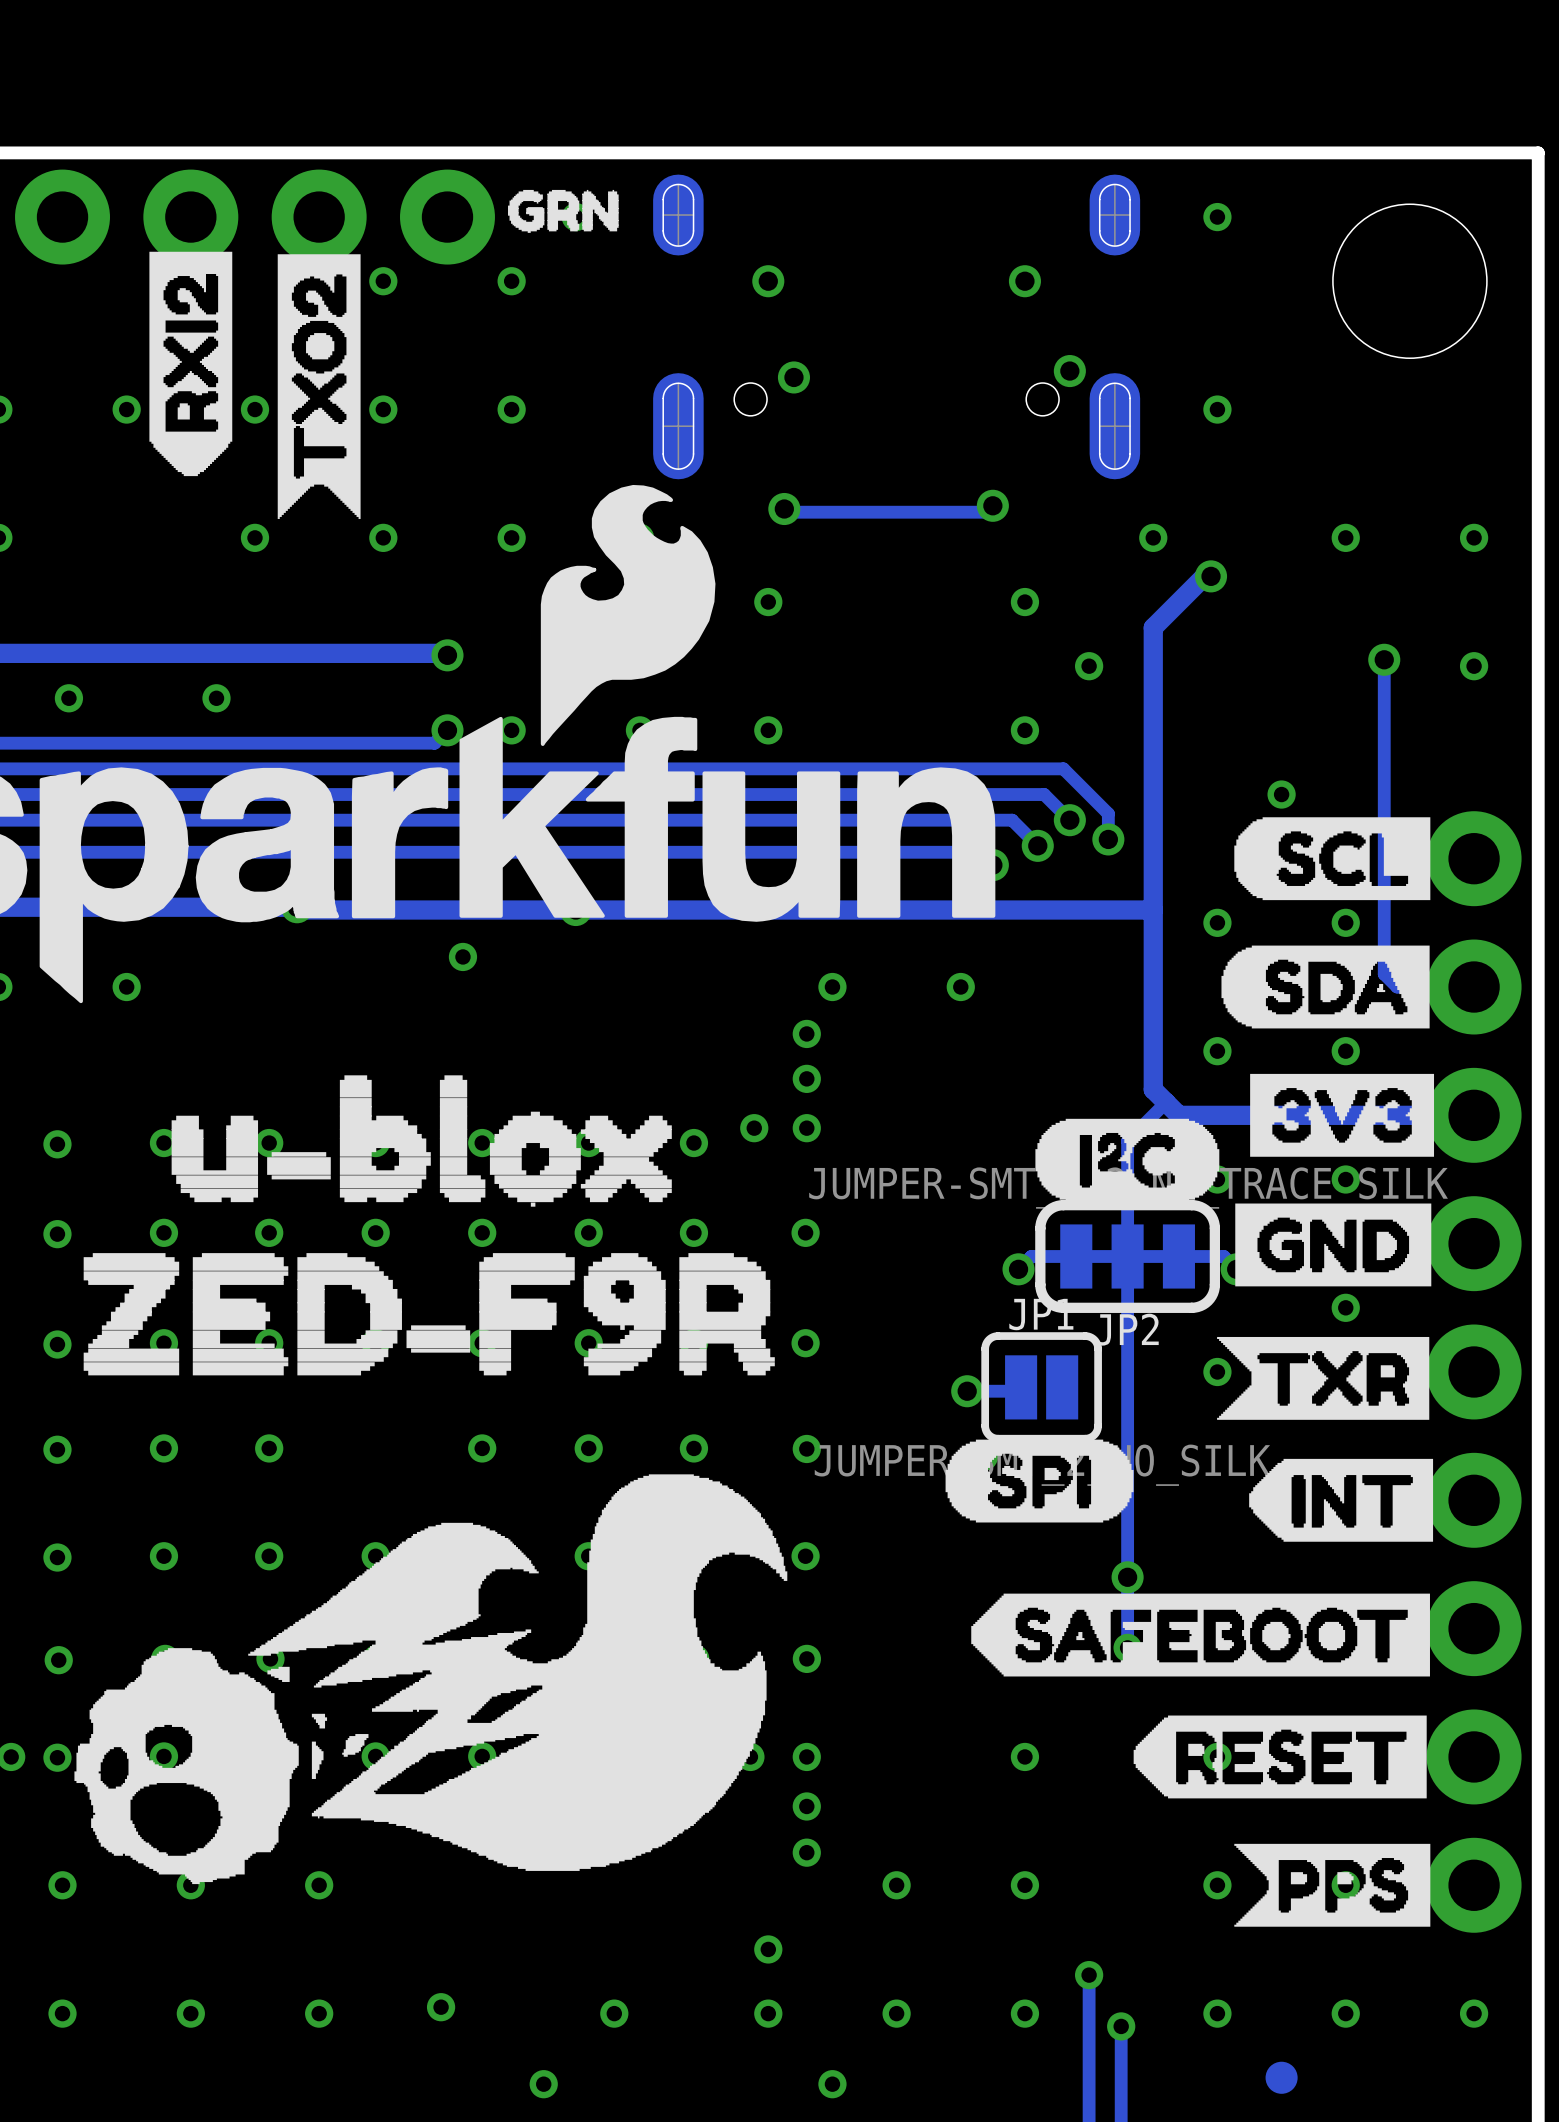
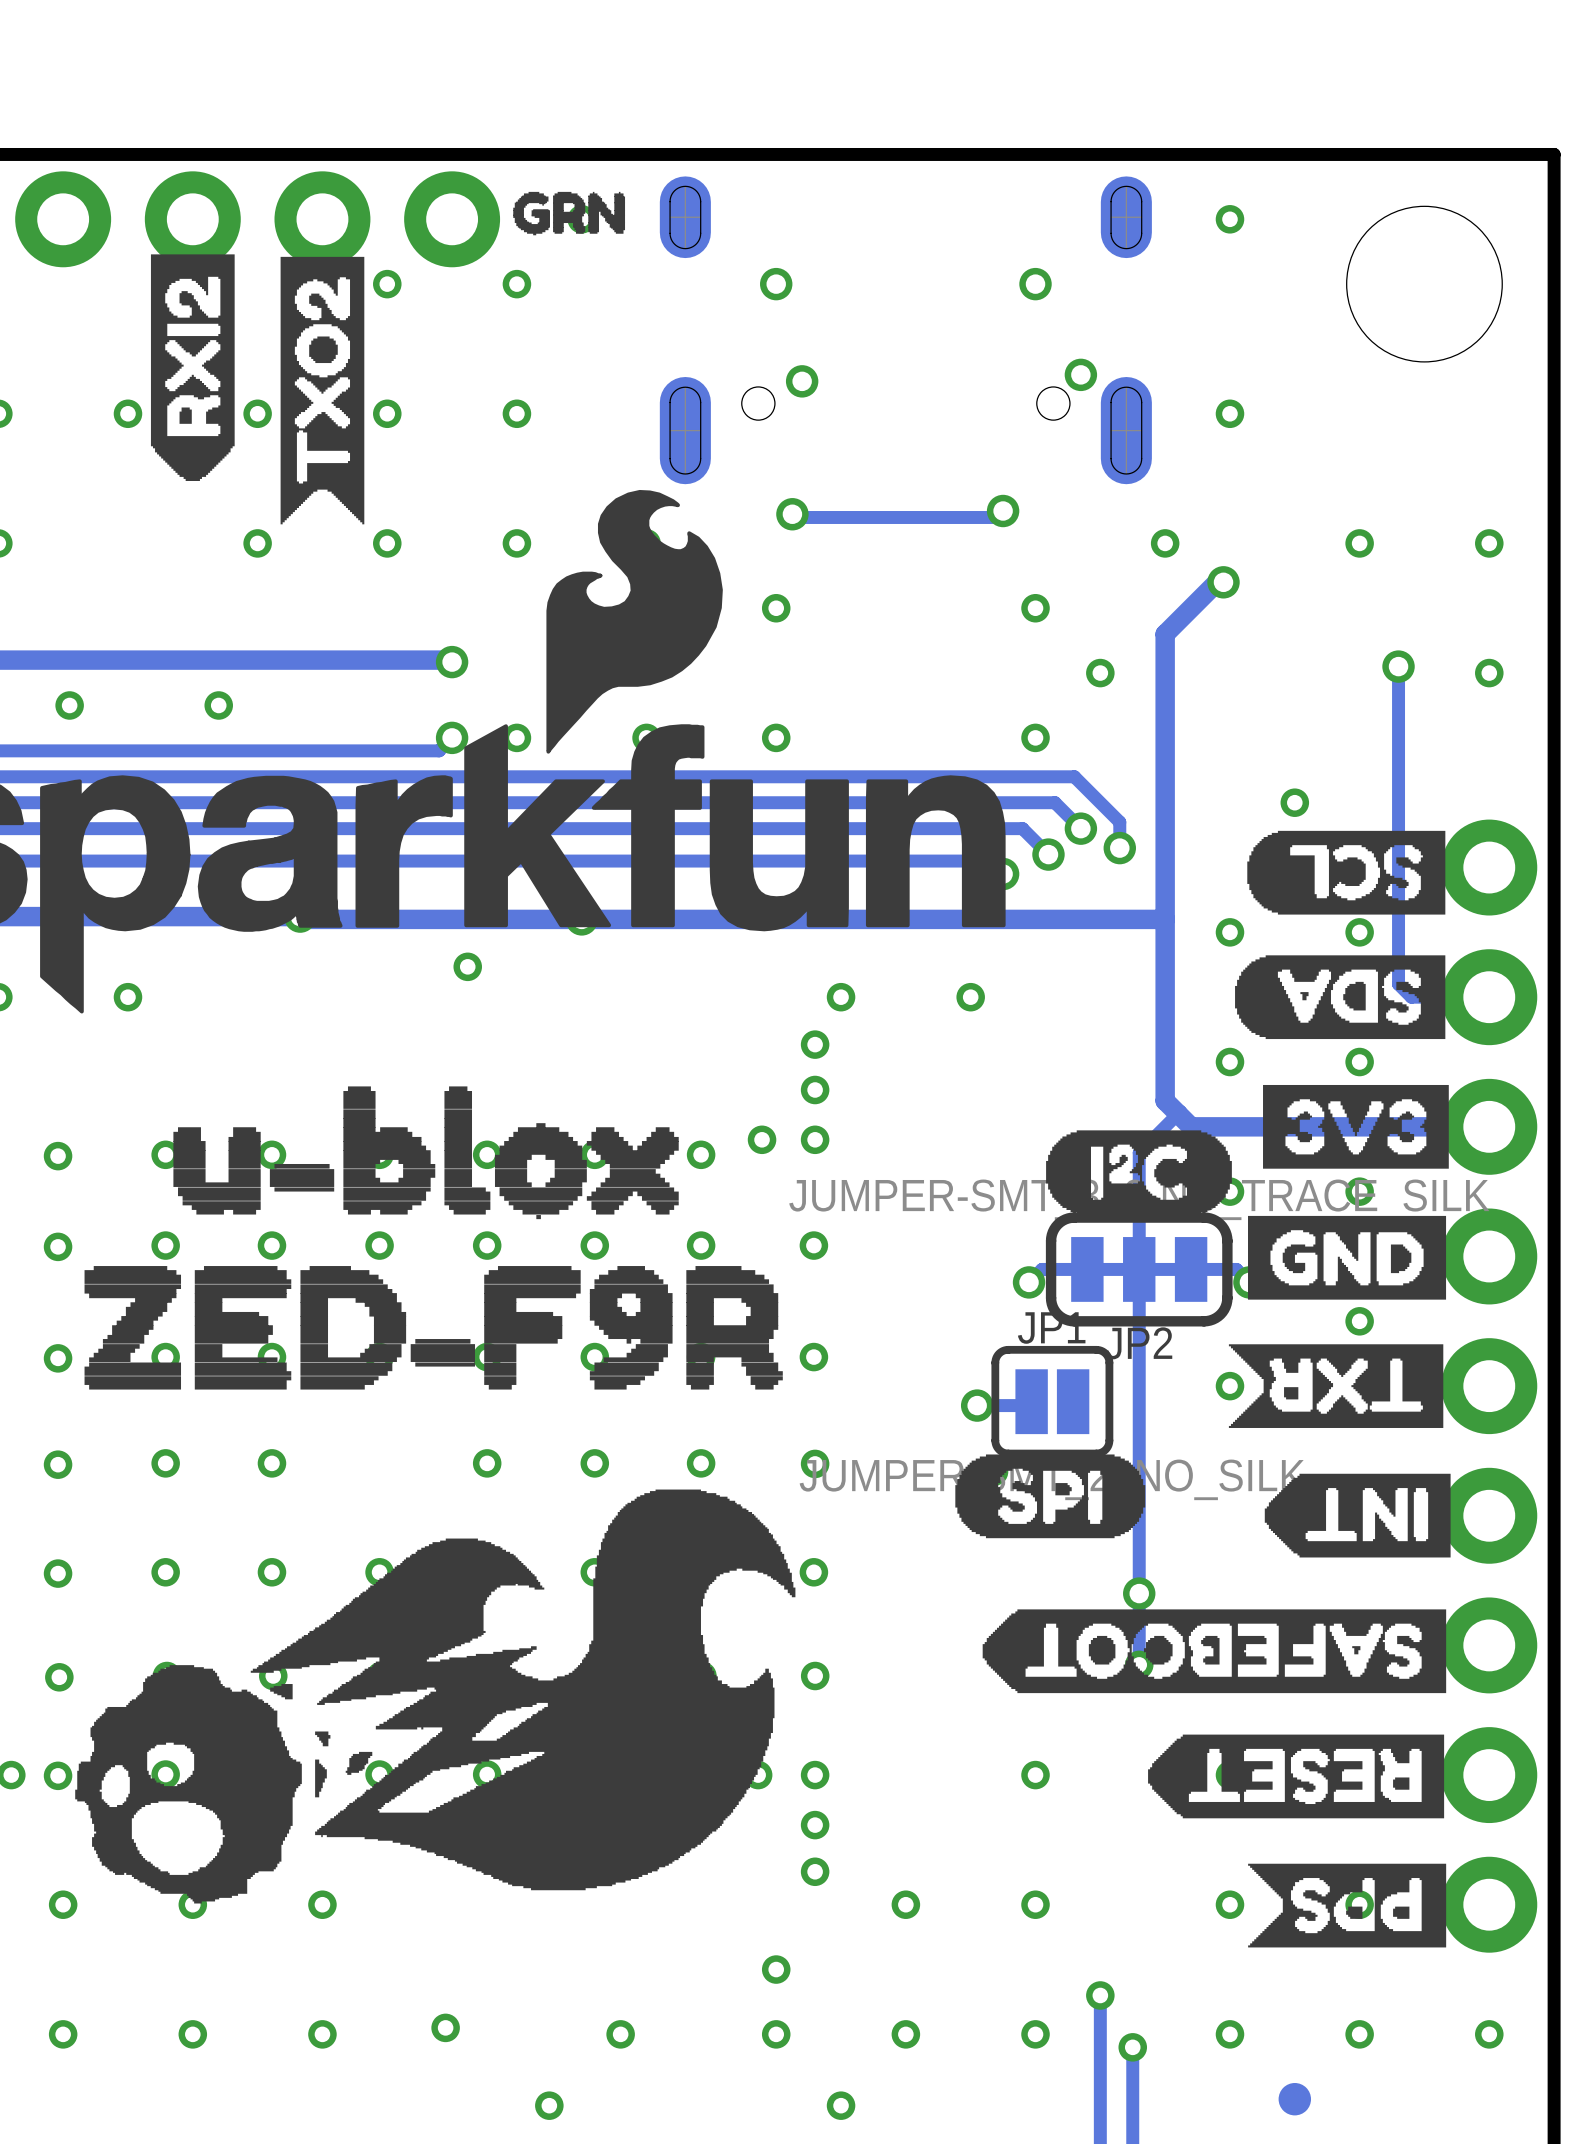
drawing shape: [1234, 817, 1431, 901] -> [1247, 830, 1446, 915]
drawing shape: [1221, 945, 1430, 1029] -> [1235, 955, 1446, 1040]
drawing shape: [1217, 1336, 1430, 1420] -> [1228, 1344, 1444, 1428]
drawing shape: [1249, 1458, 1434, 1542] -> [1264, 1473, 1451, 1558]
drawing shape: [971, 1593, 1430, 1677] -> [982, 1609, 1447, 1694]
drawing shape: [1133, 1715, 1427, 1799] -> [1148, 1734, 1445, 1819]
drawing shape: [1234, 1843, 1431, 1927] -> [1248, 1863, 1447, 1948]

